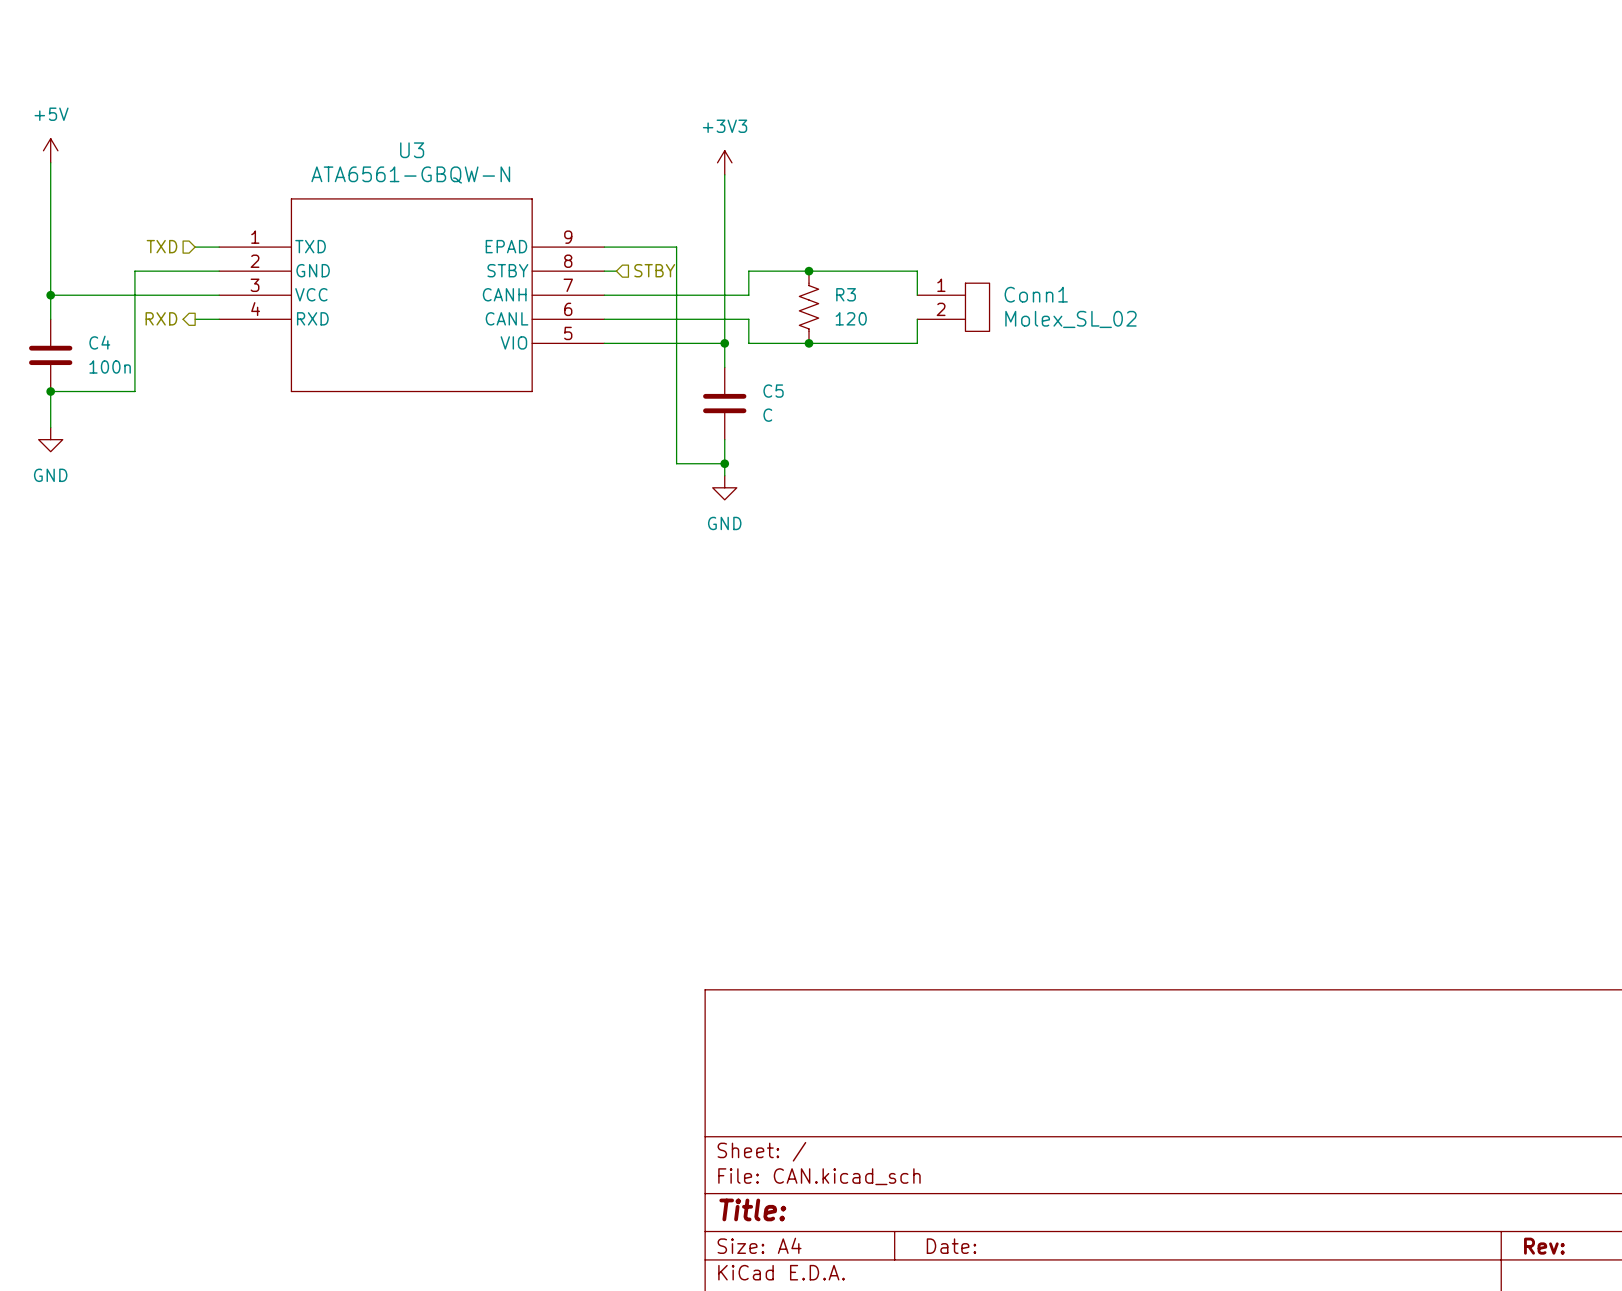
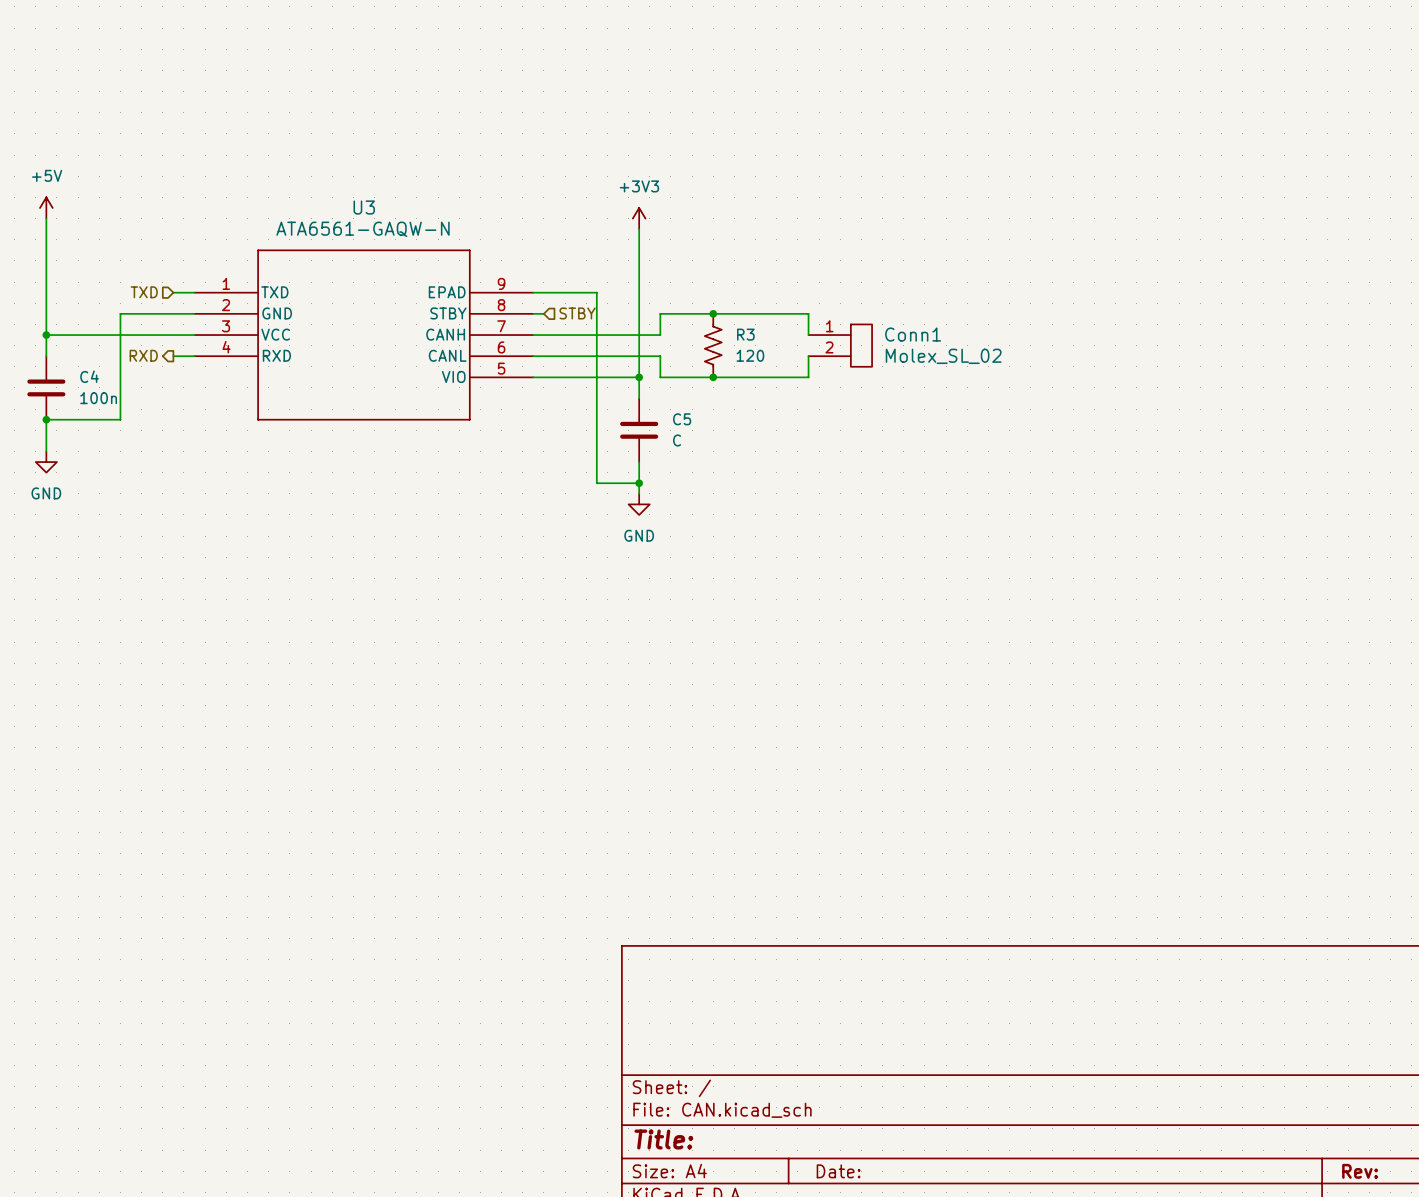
U3 value: ATA6561-GBQW-N (410, 175) -> ATA6561-GAQW-N (363, 229)

